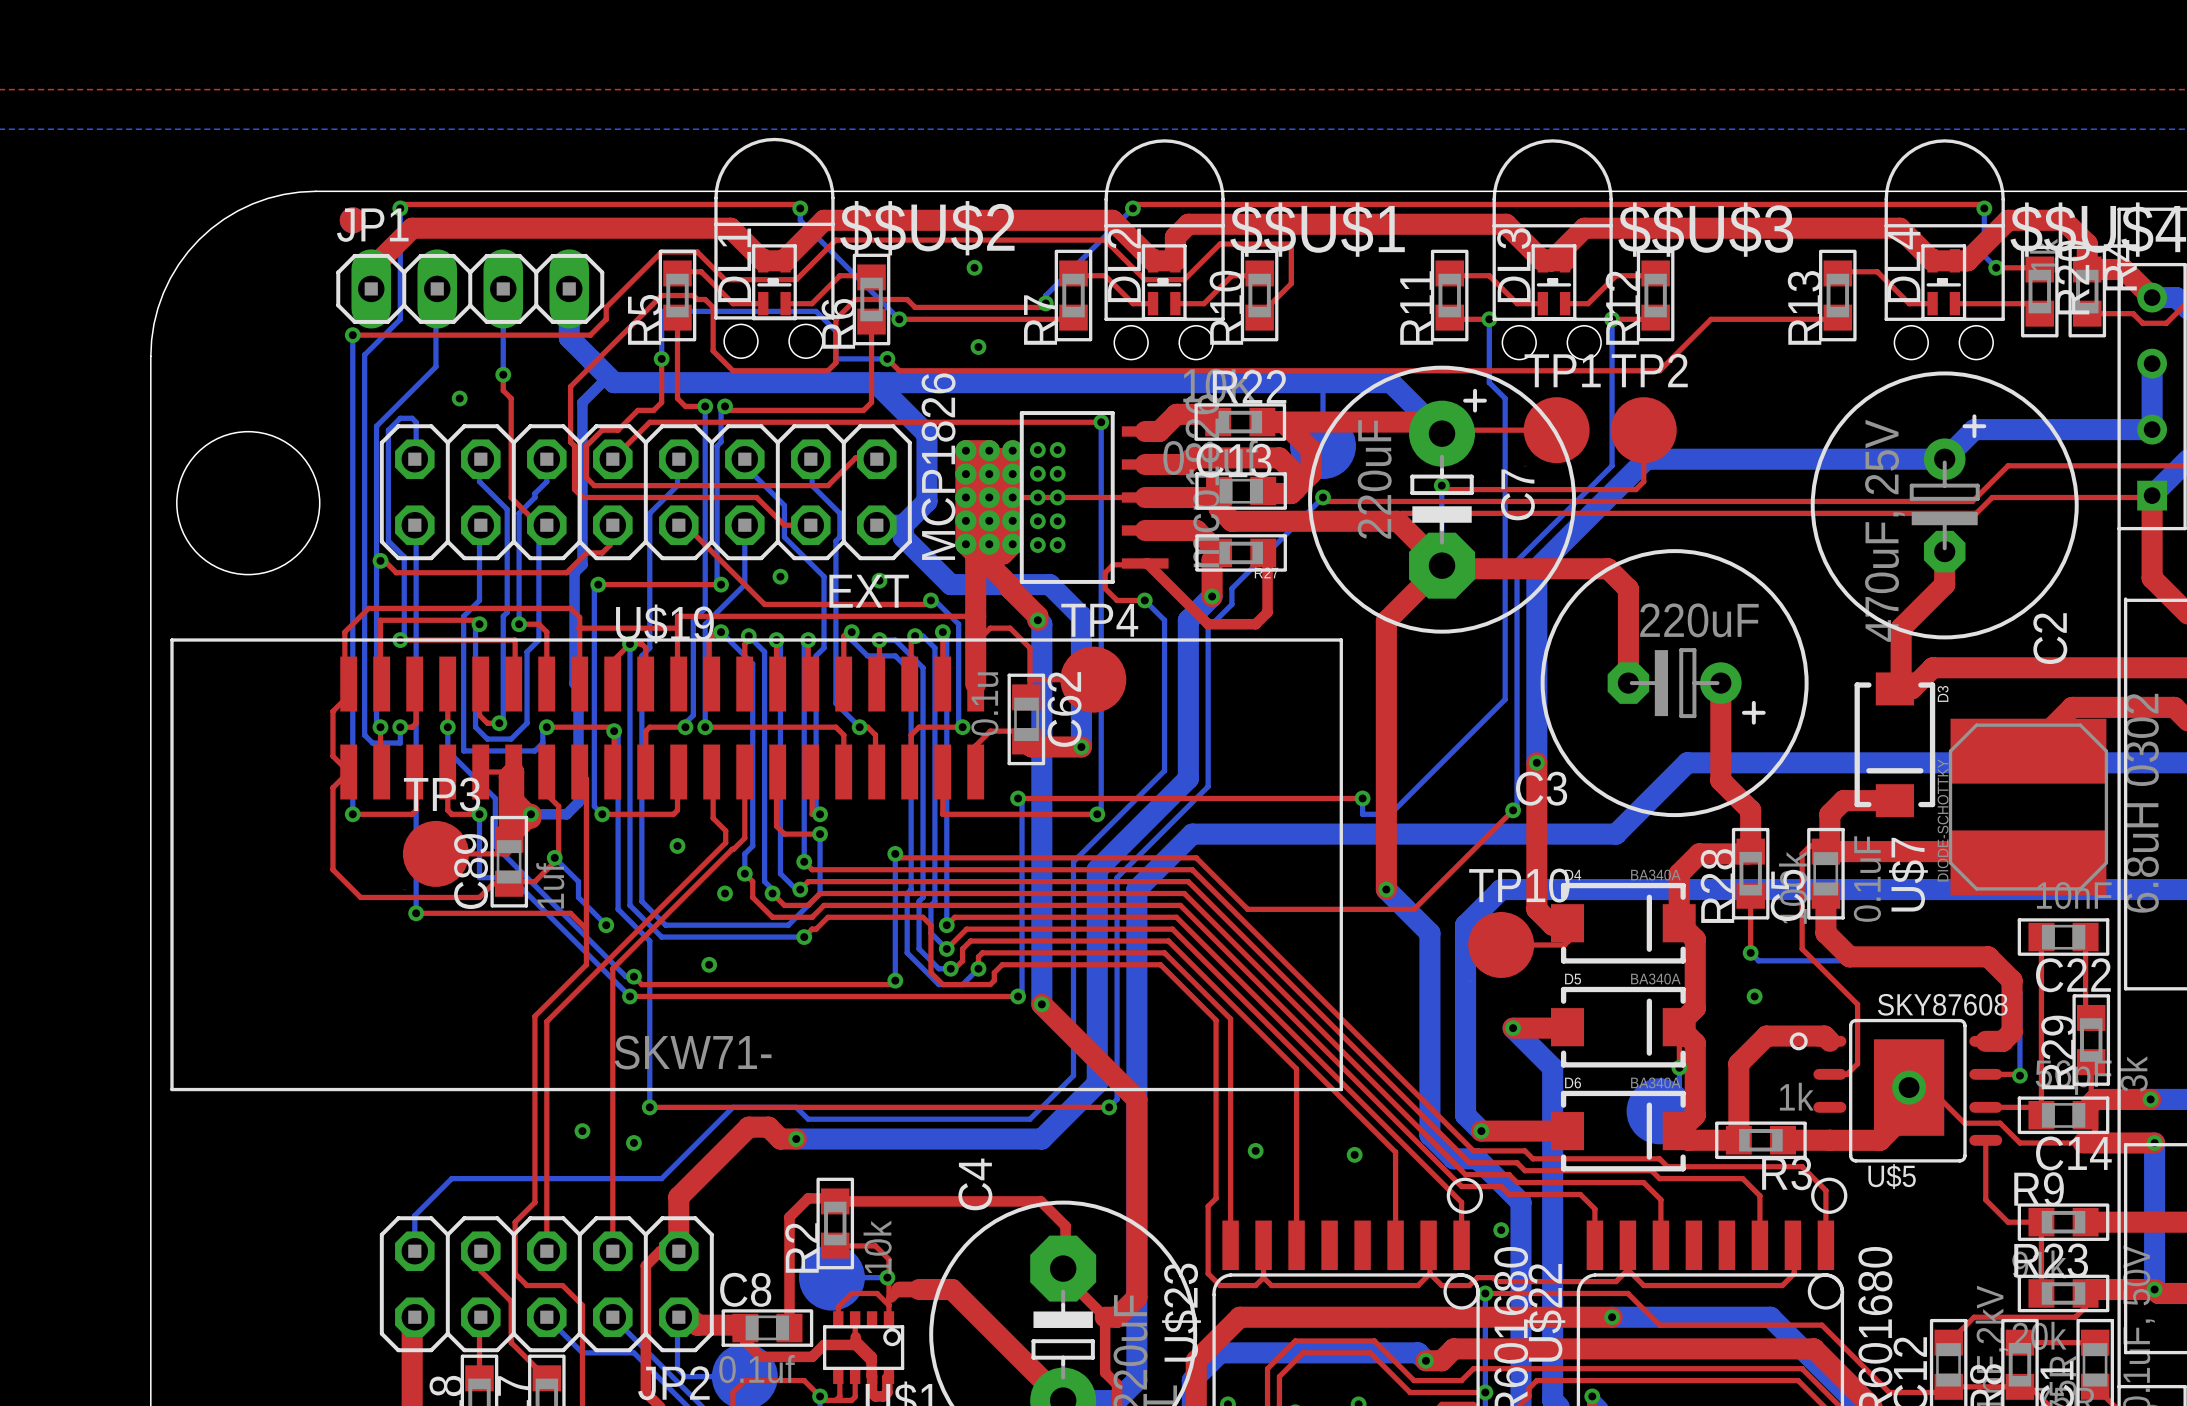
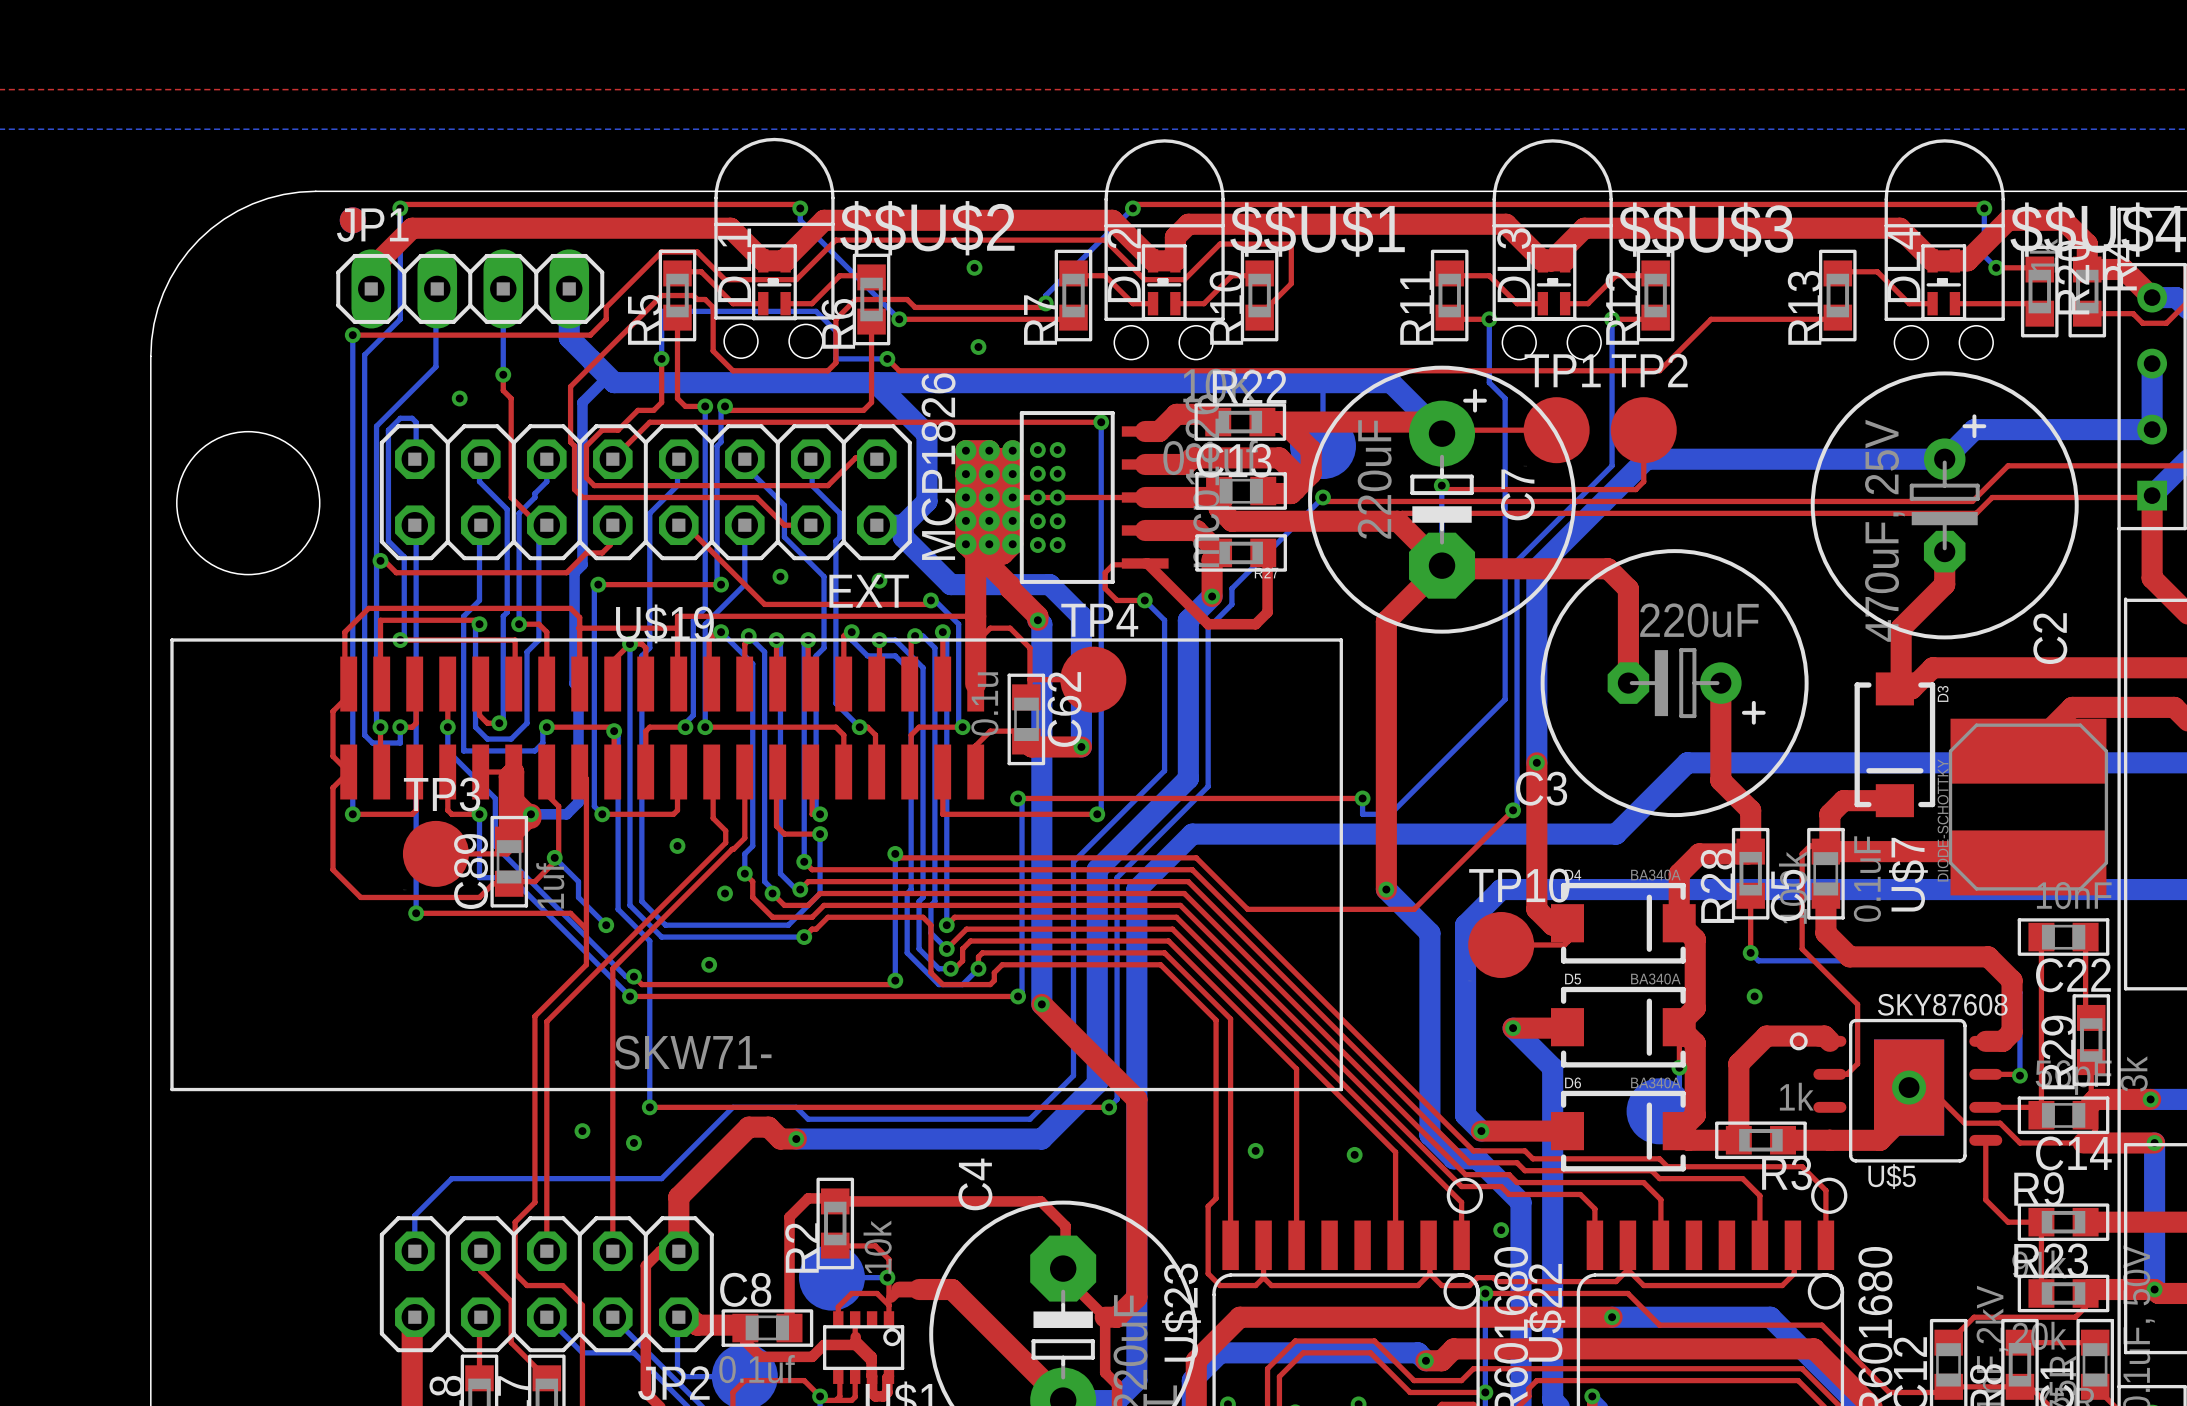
U$7 value: 6.8uH 0302 (2141, 803) -> none

